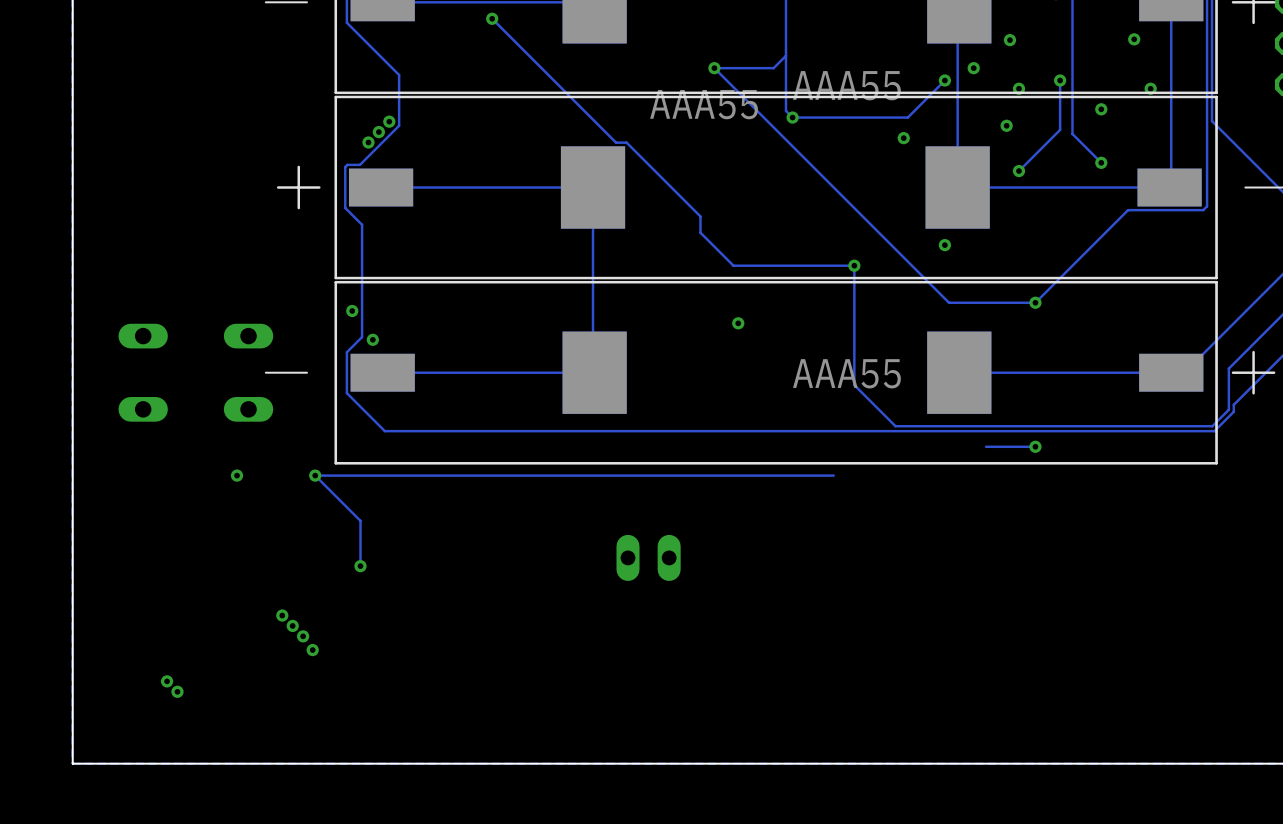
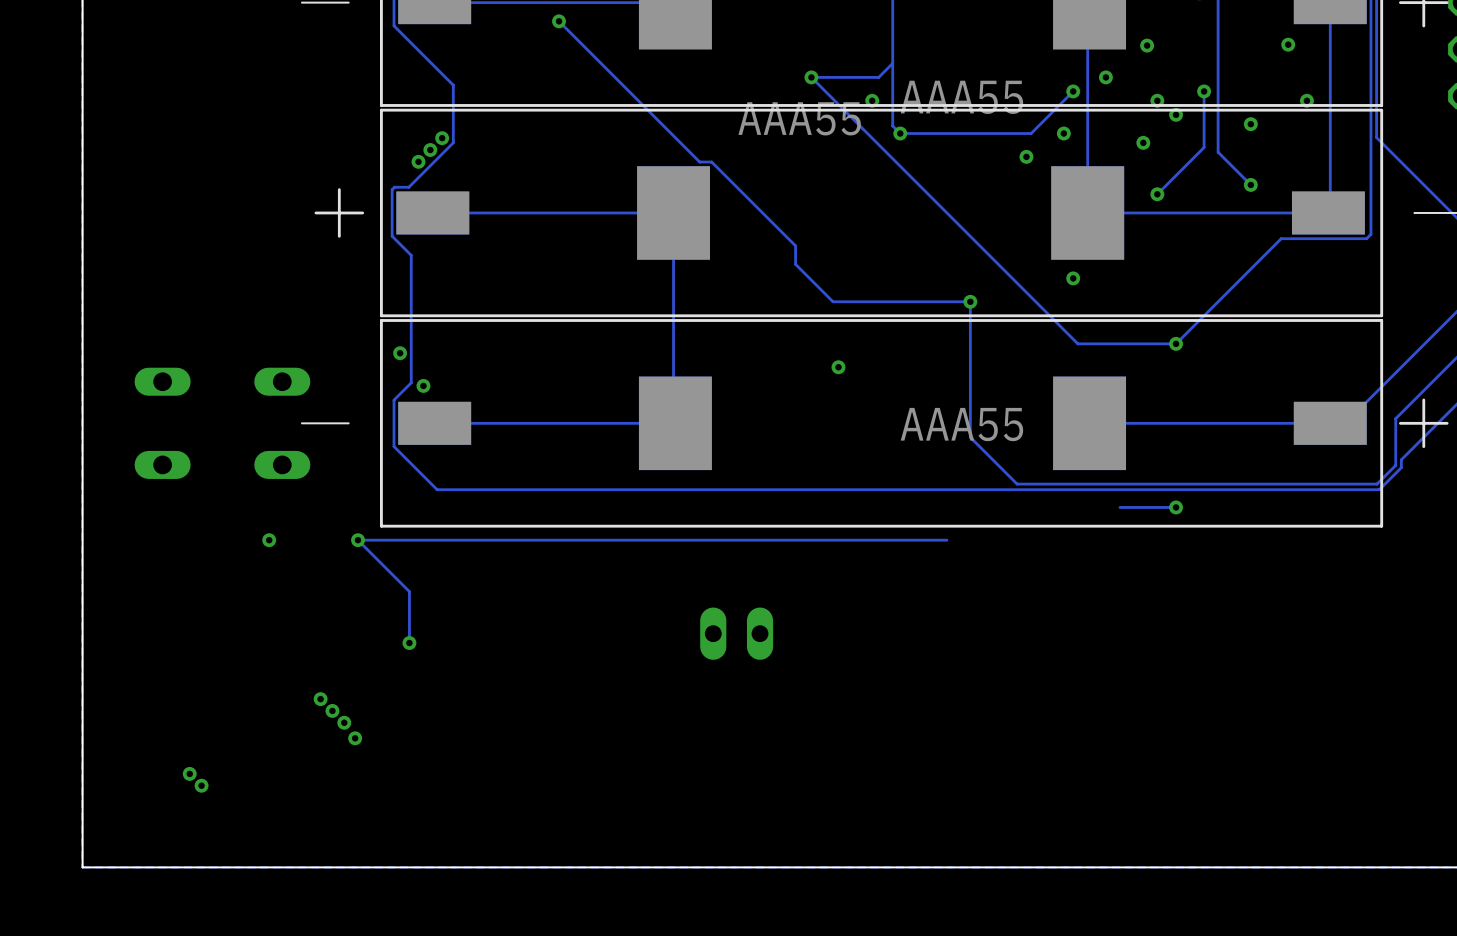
via: none -> (872, 100)
via: none -> (1176, 114)
via: none -> (1063, 133)

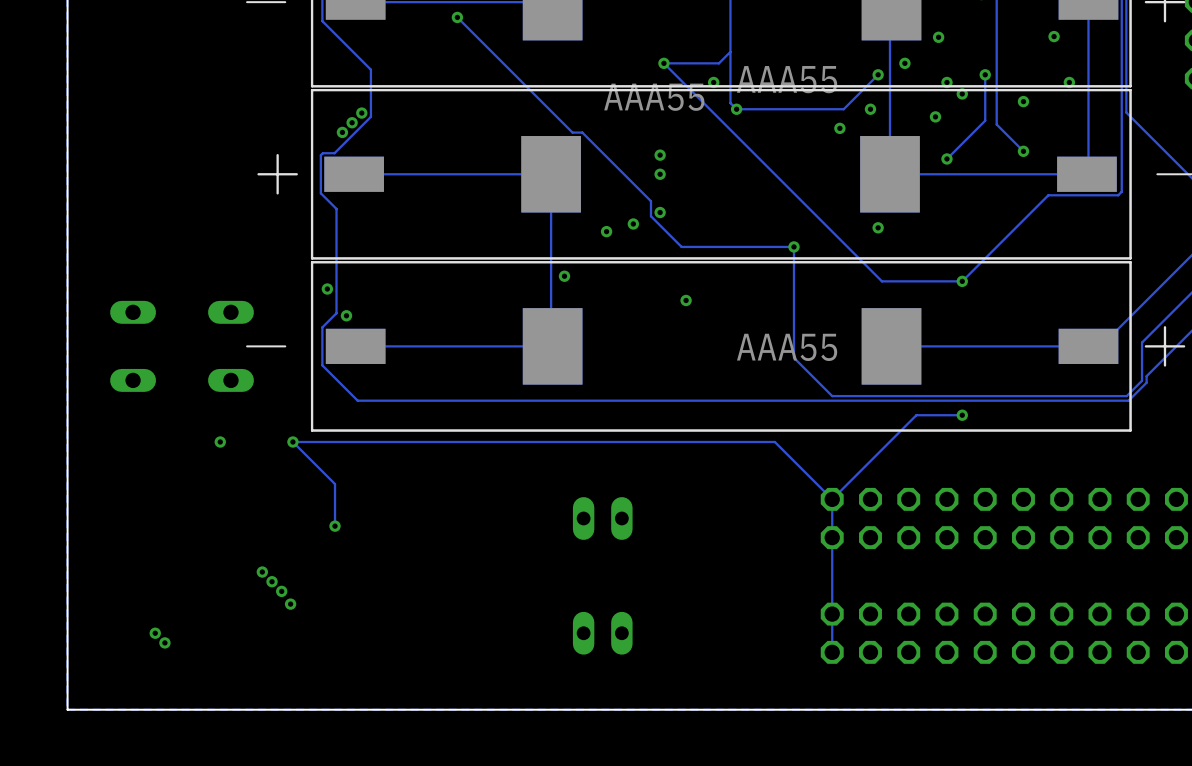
via: none -> (660, 155)
via: none -> (660, 174)
via: none -> (660, 212)
via: none -> (633, 223)
via: none -> (606, 231)
via: none -> (564, 276)
track: none -> (916, 415) (832, 499)
track: none -> (774, 442) (832, 499)
track: none -> (832, 499) (832, 652)
part: none -> (1004, 518)
part: none -> (602, 633)
part: none -> (1004, 633)

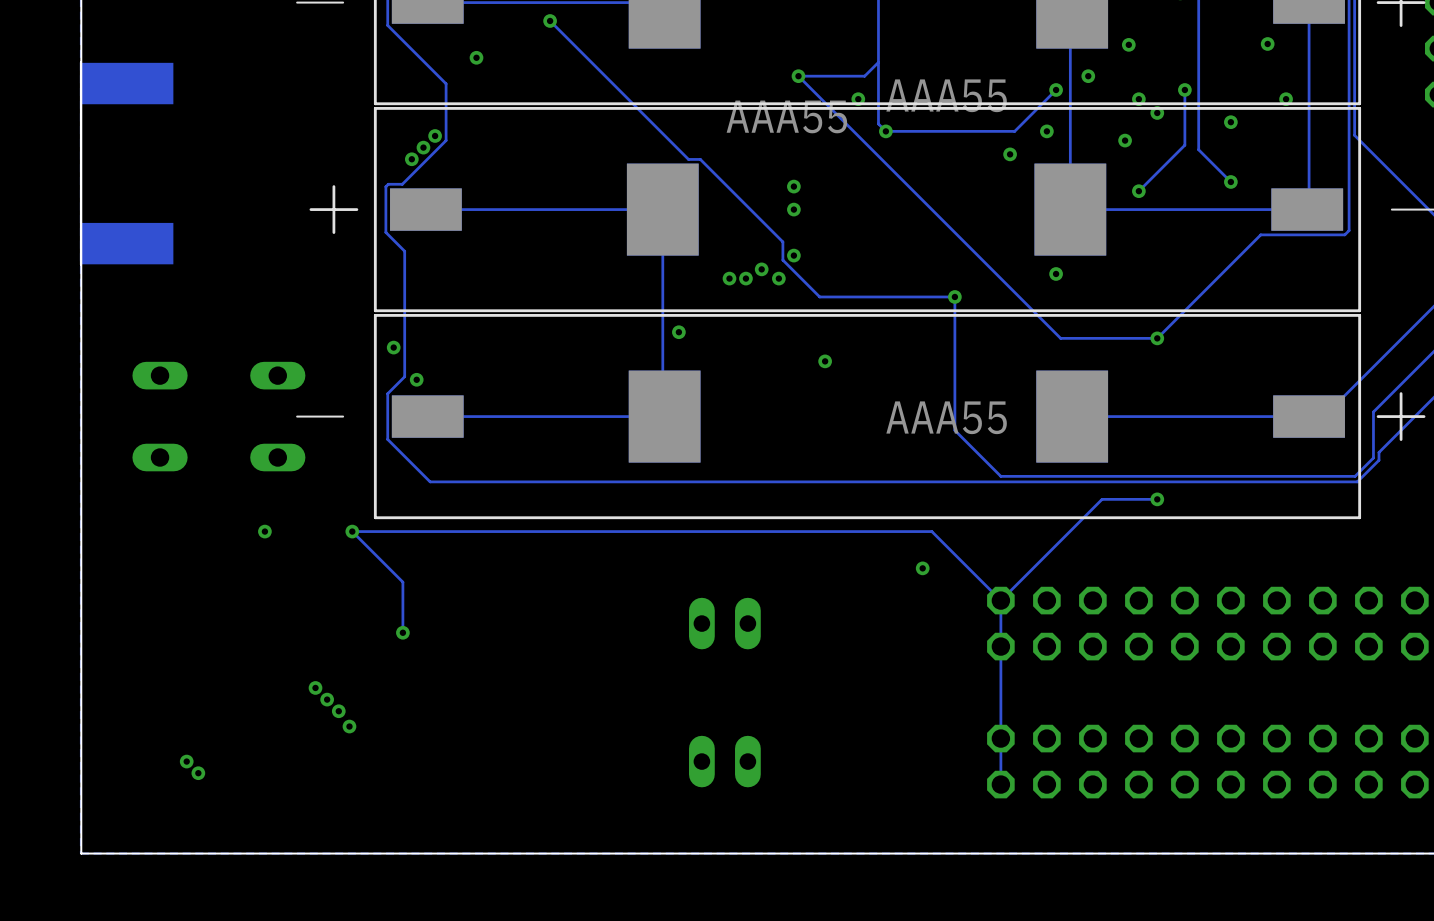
via: none -> (476, 57)
part: none -> (127, 163)
via: none -> (745, 278)
via: none -> (778, 278)
via: none -> (922, 568)

